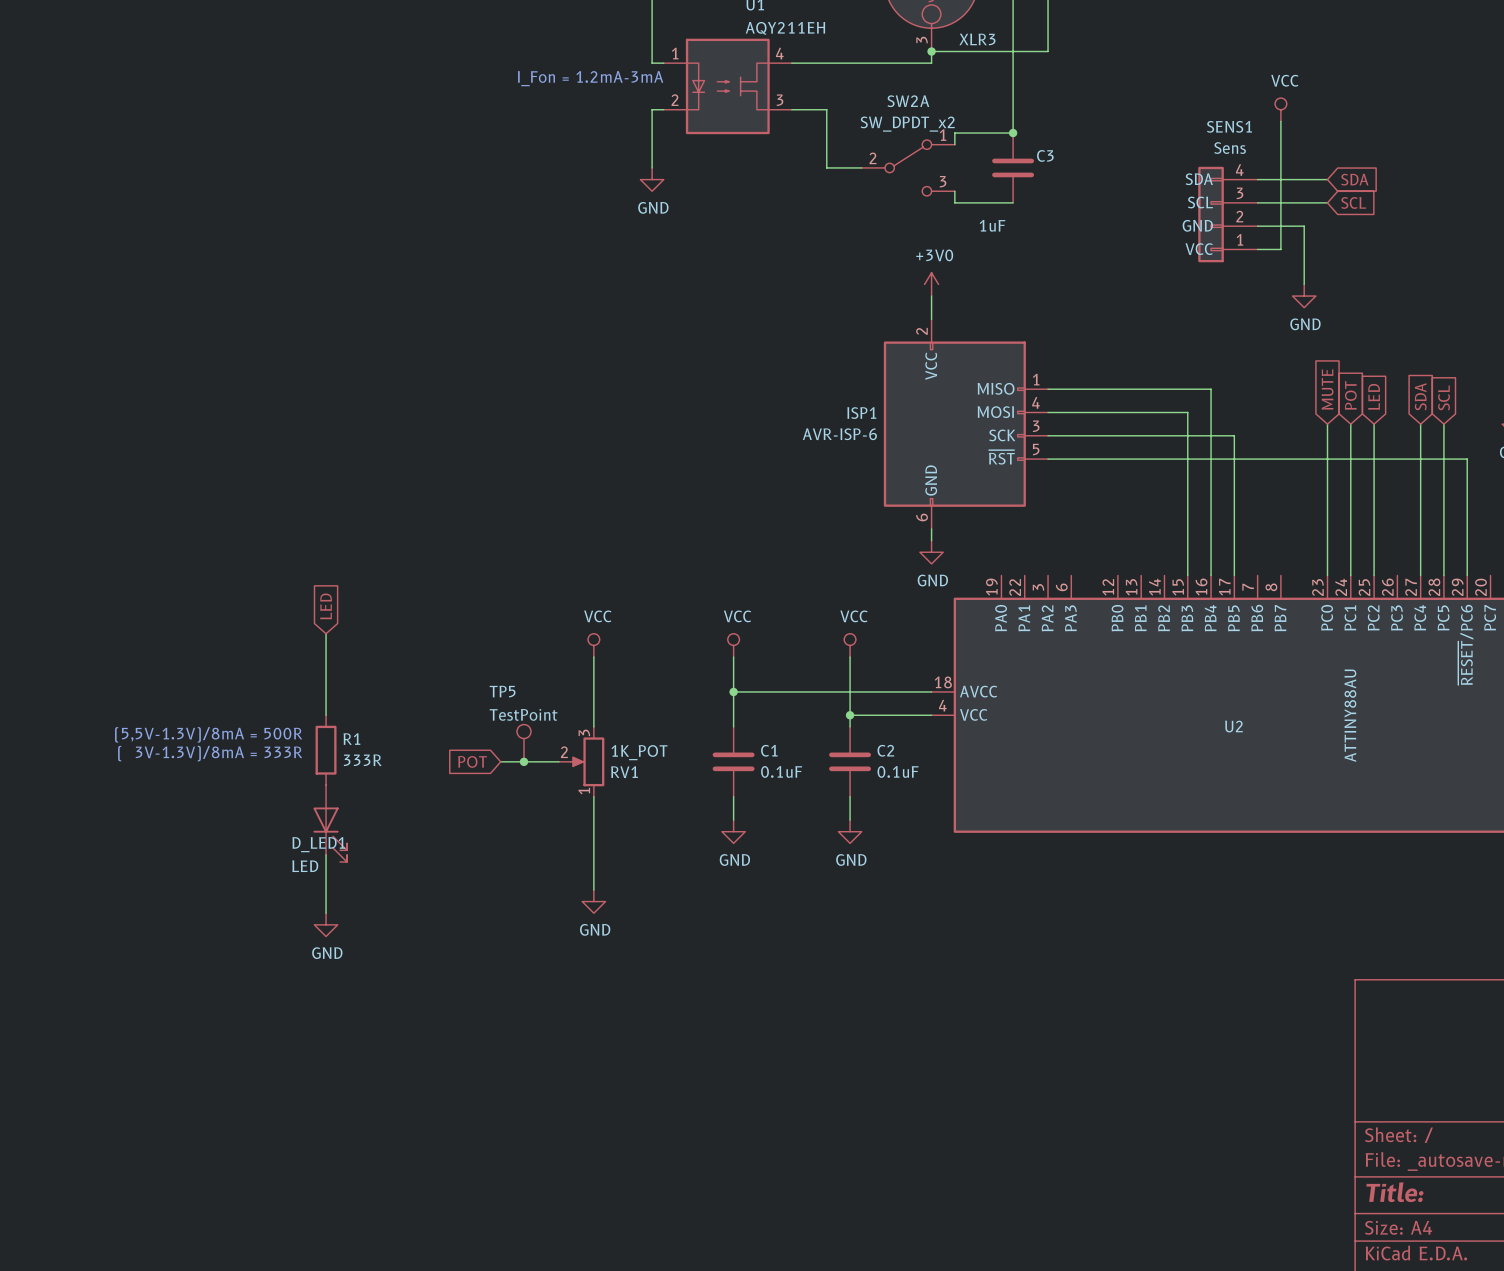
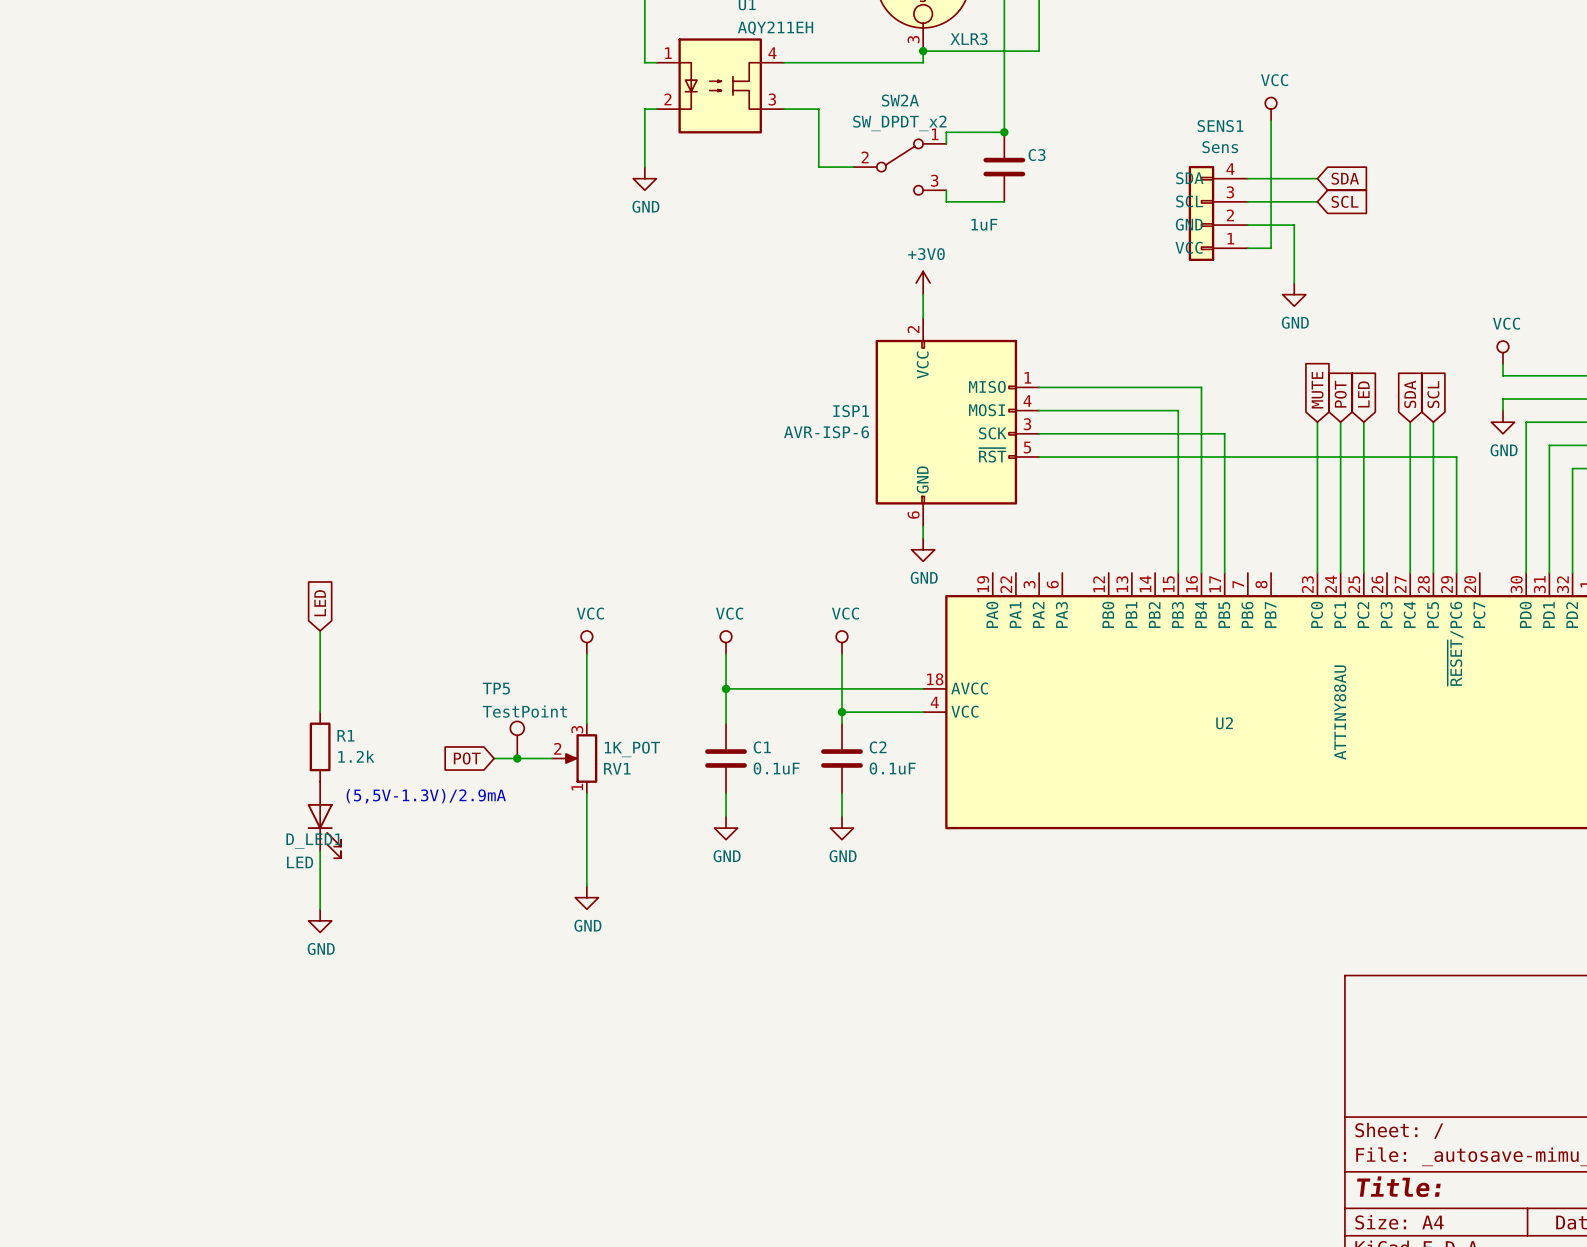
text: I_Fon = 1.2mA-3mA (590, 78) -> none
text: (5,5V-1.3V)/8mA = 500R (208, 734) -> none
text: ( 3V-1.3V)/8mA = 333R (210, 753) -> none
R1 value: 333R (362, 760) -> 1.2k (356, 756)
text: none -> (5,5V-1.3V)/2.9mA (426, 796)

